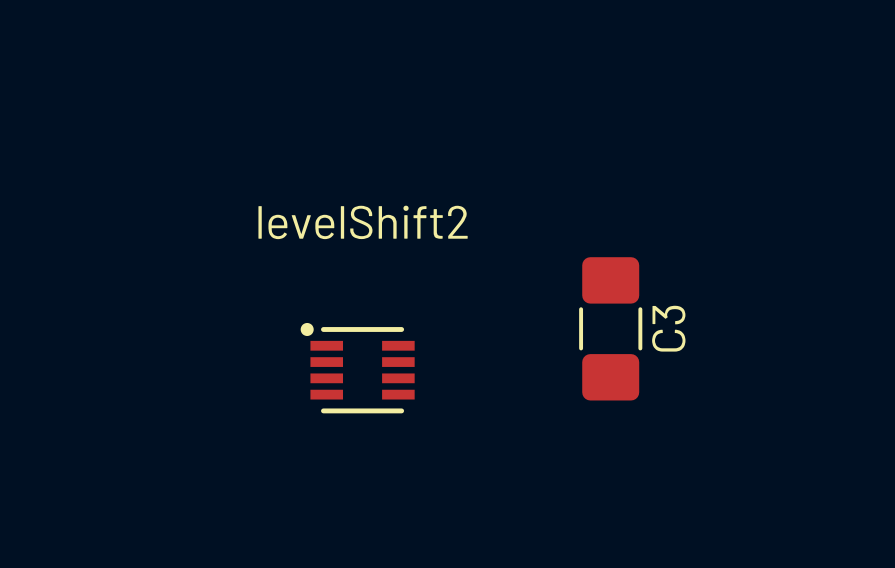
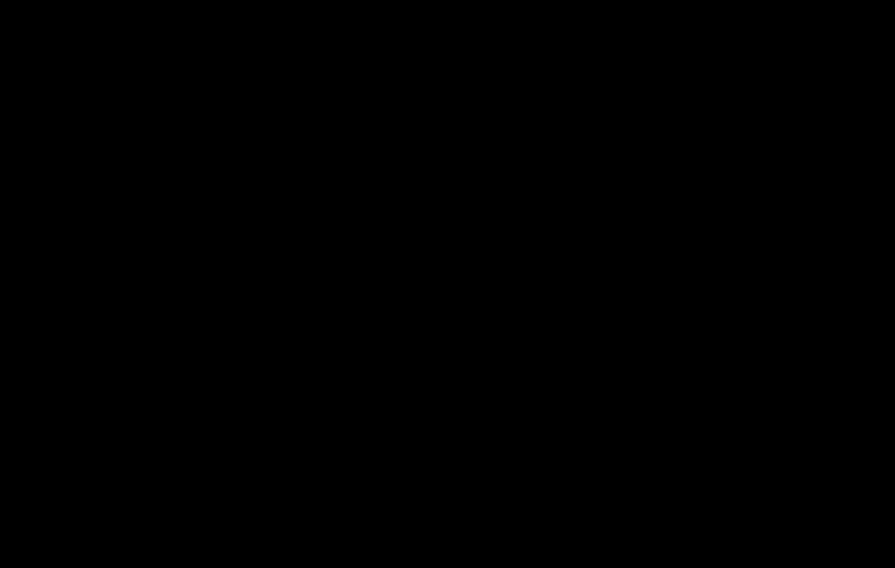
C3: (610, 328) -> none
levelShift2: (357, 368) -> none

